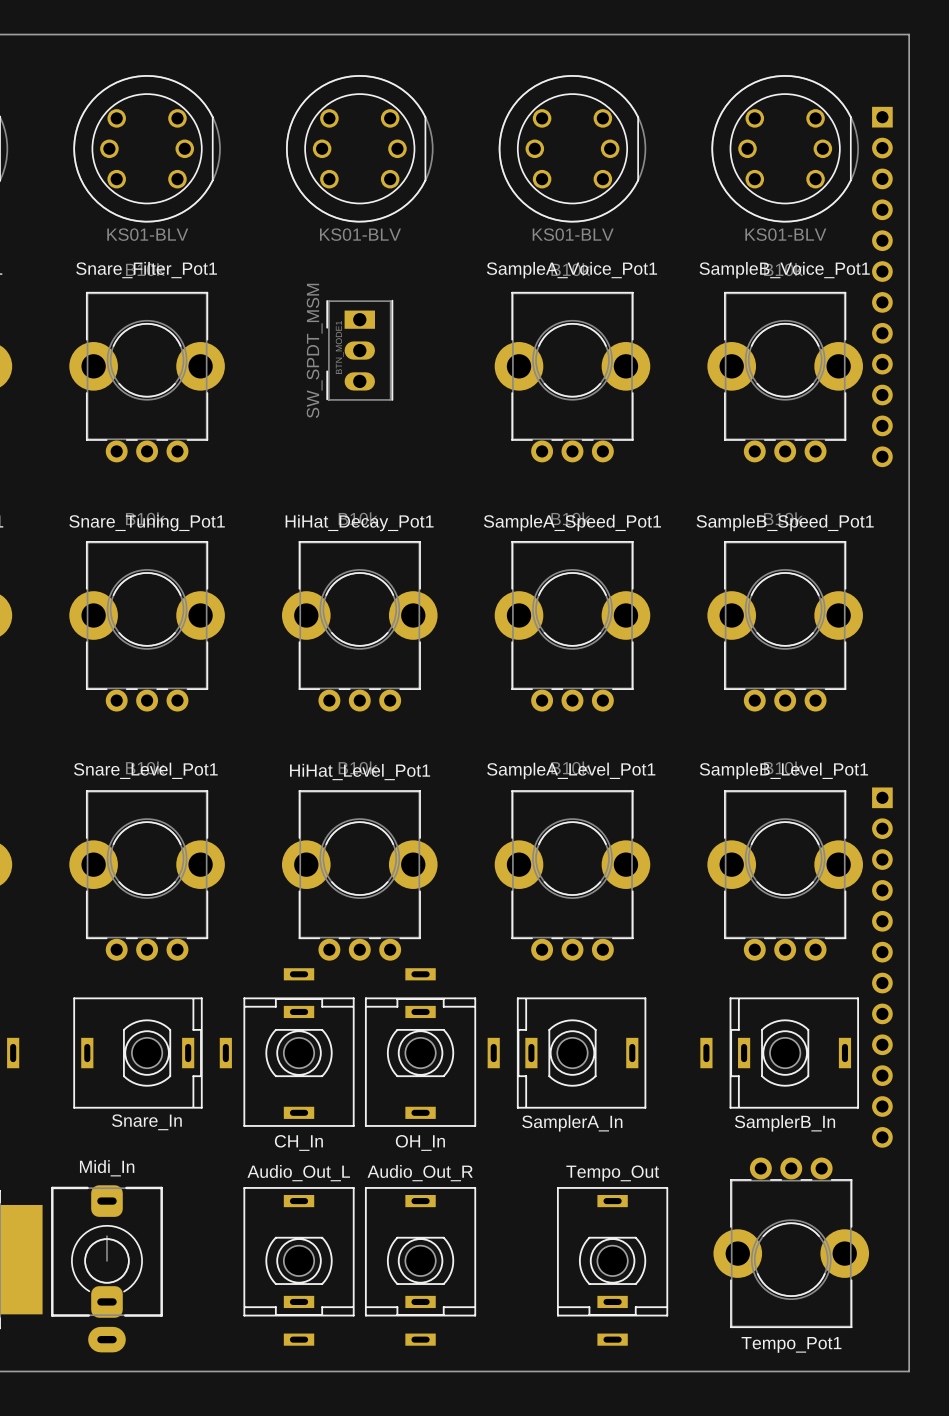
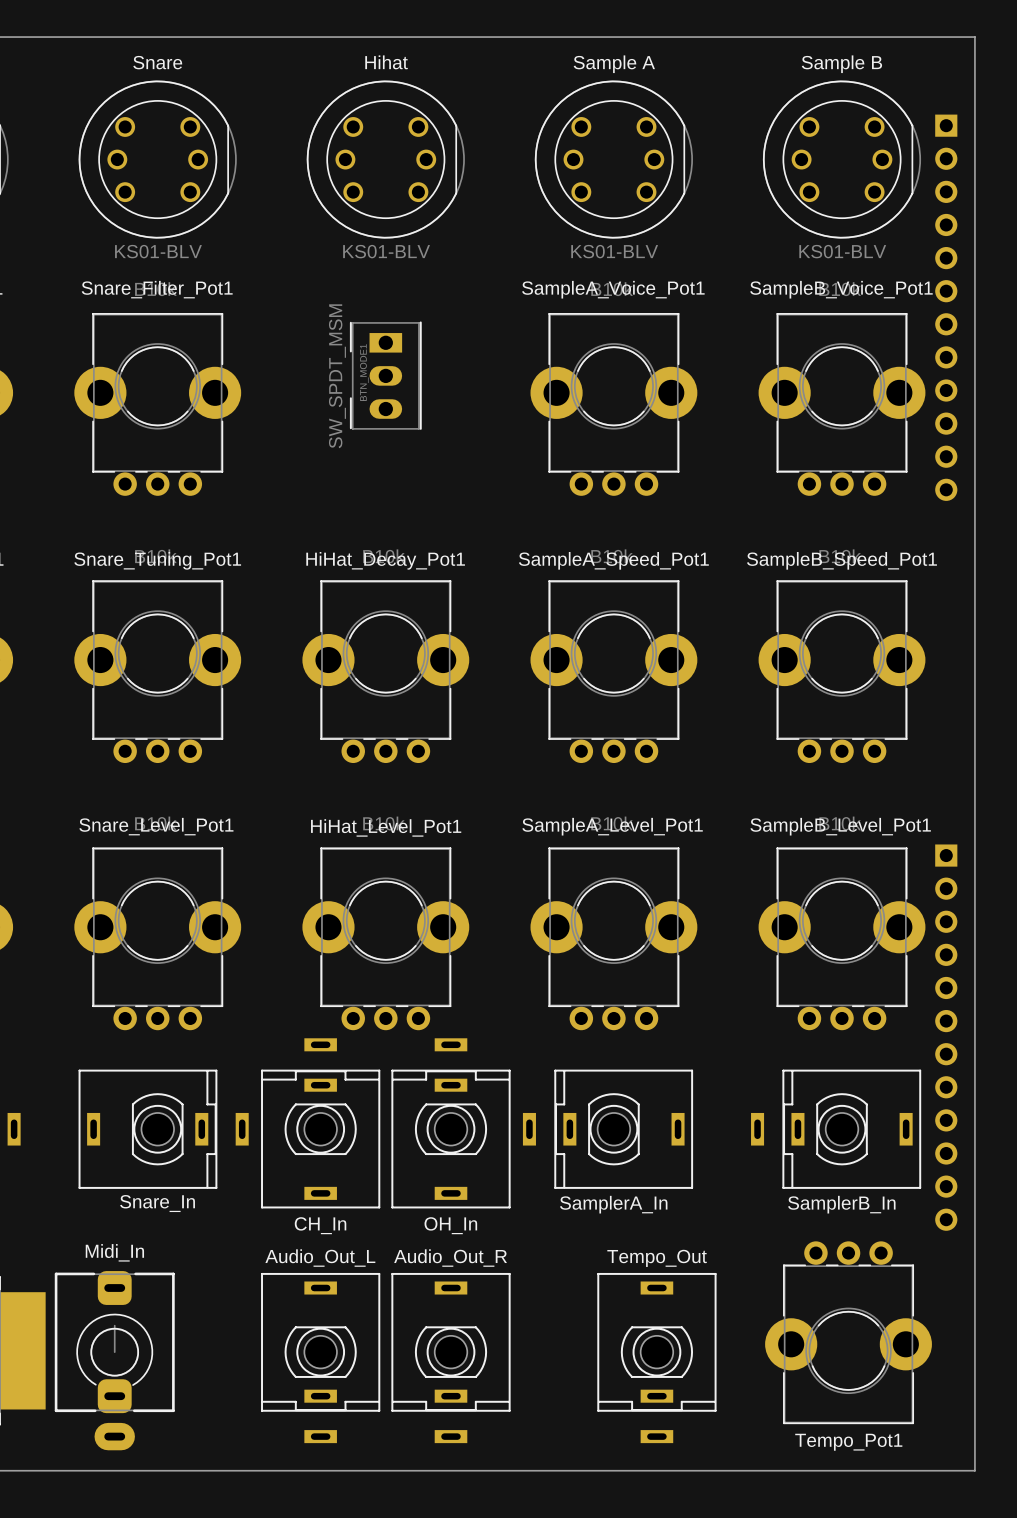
text: none -> Snare (157, 62)
text: none -> Hihat (386, 62)
text: none -> Sample A (614, 64)
text: none -> Sample B (841, 64)

